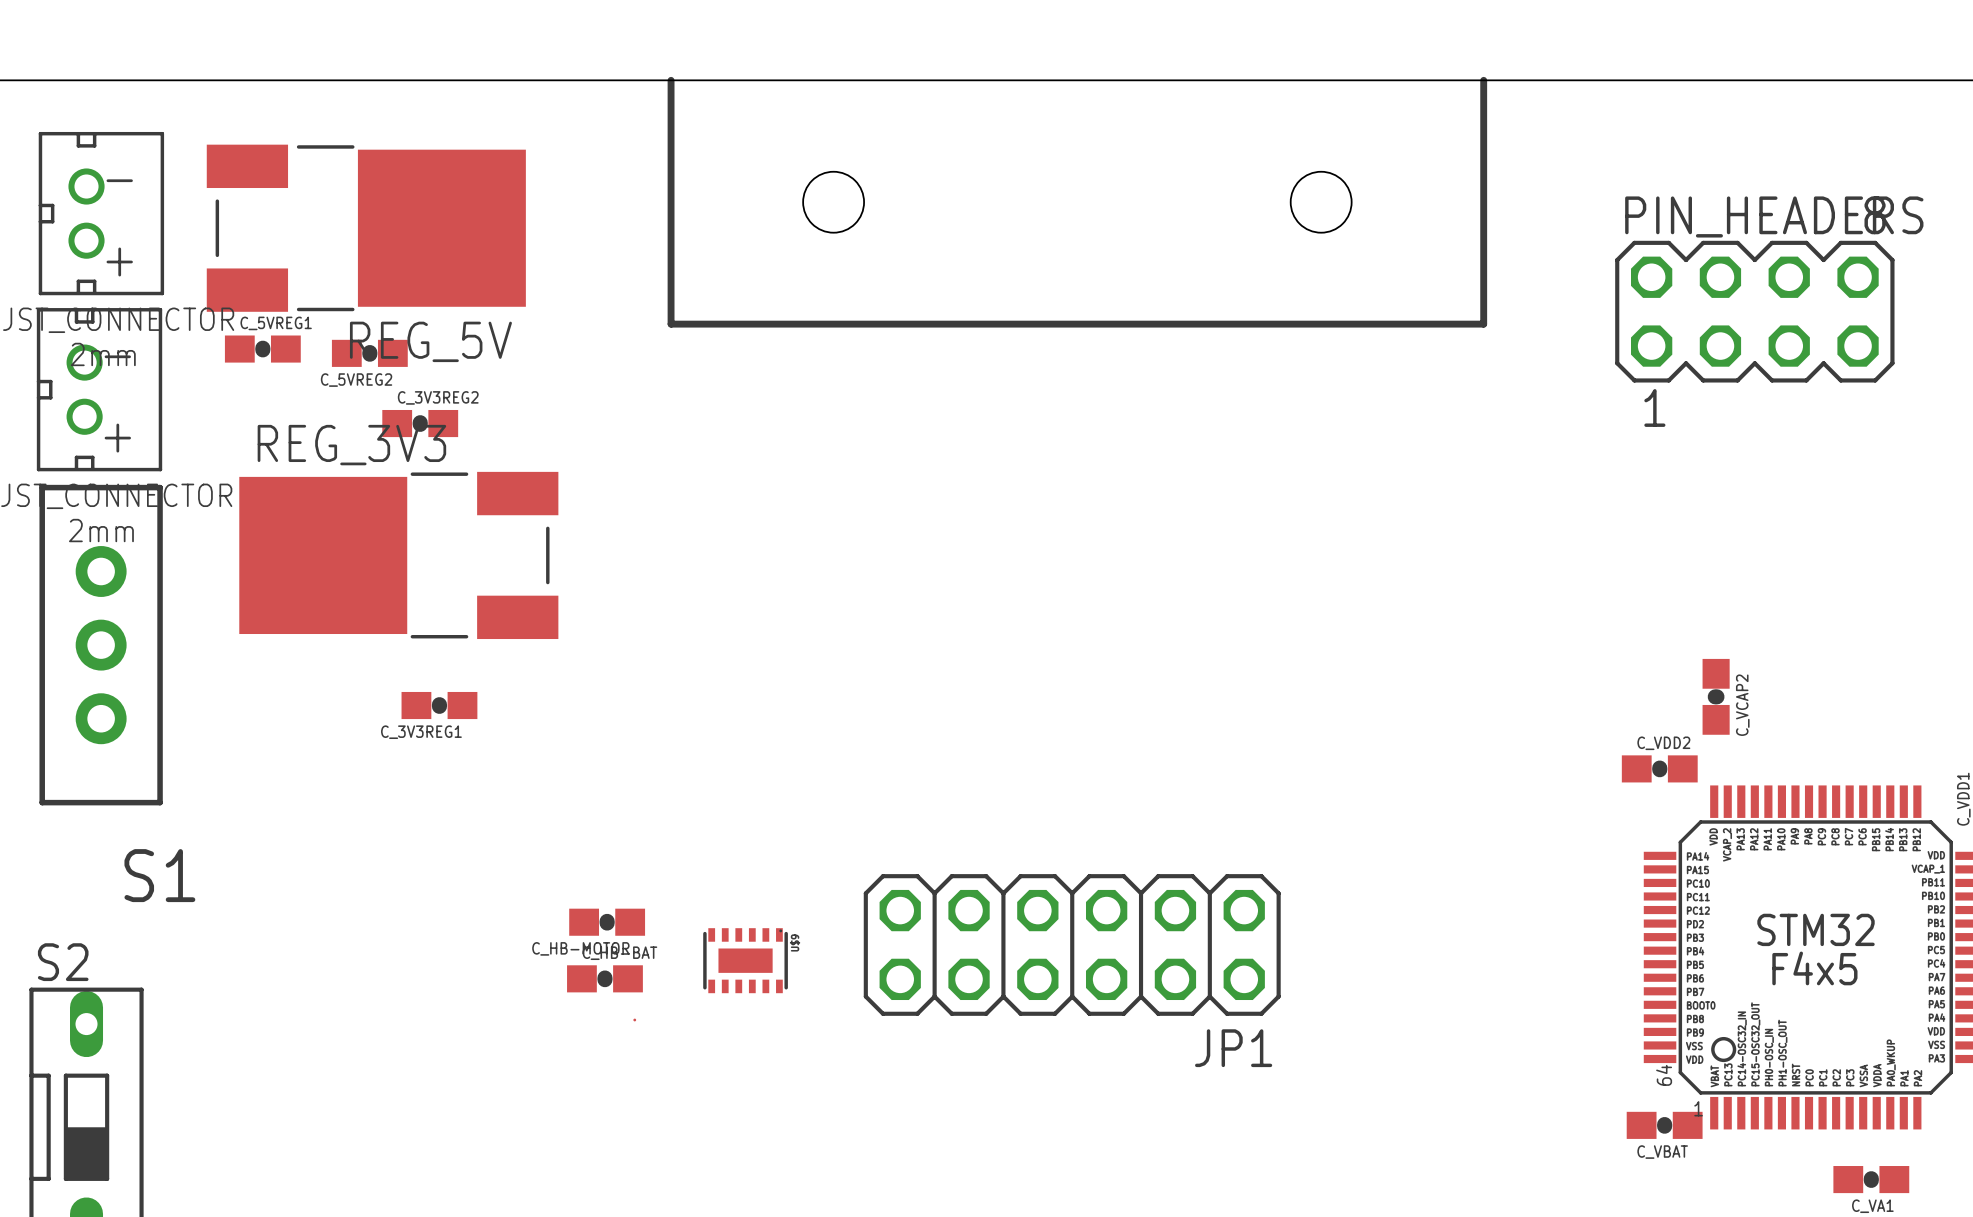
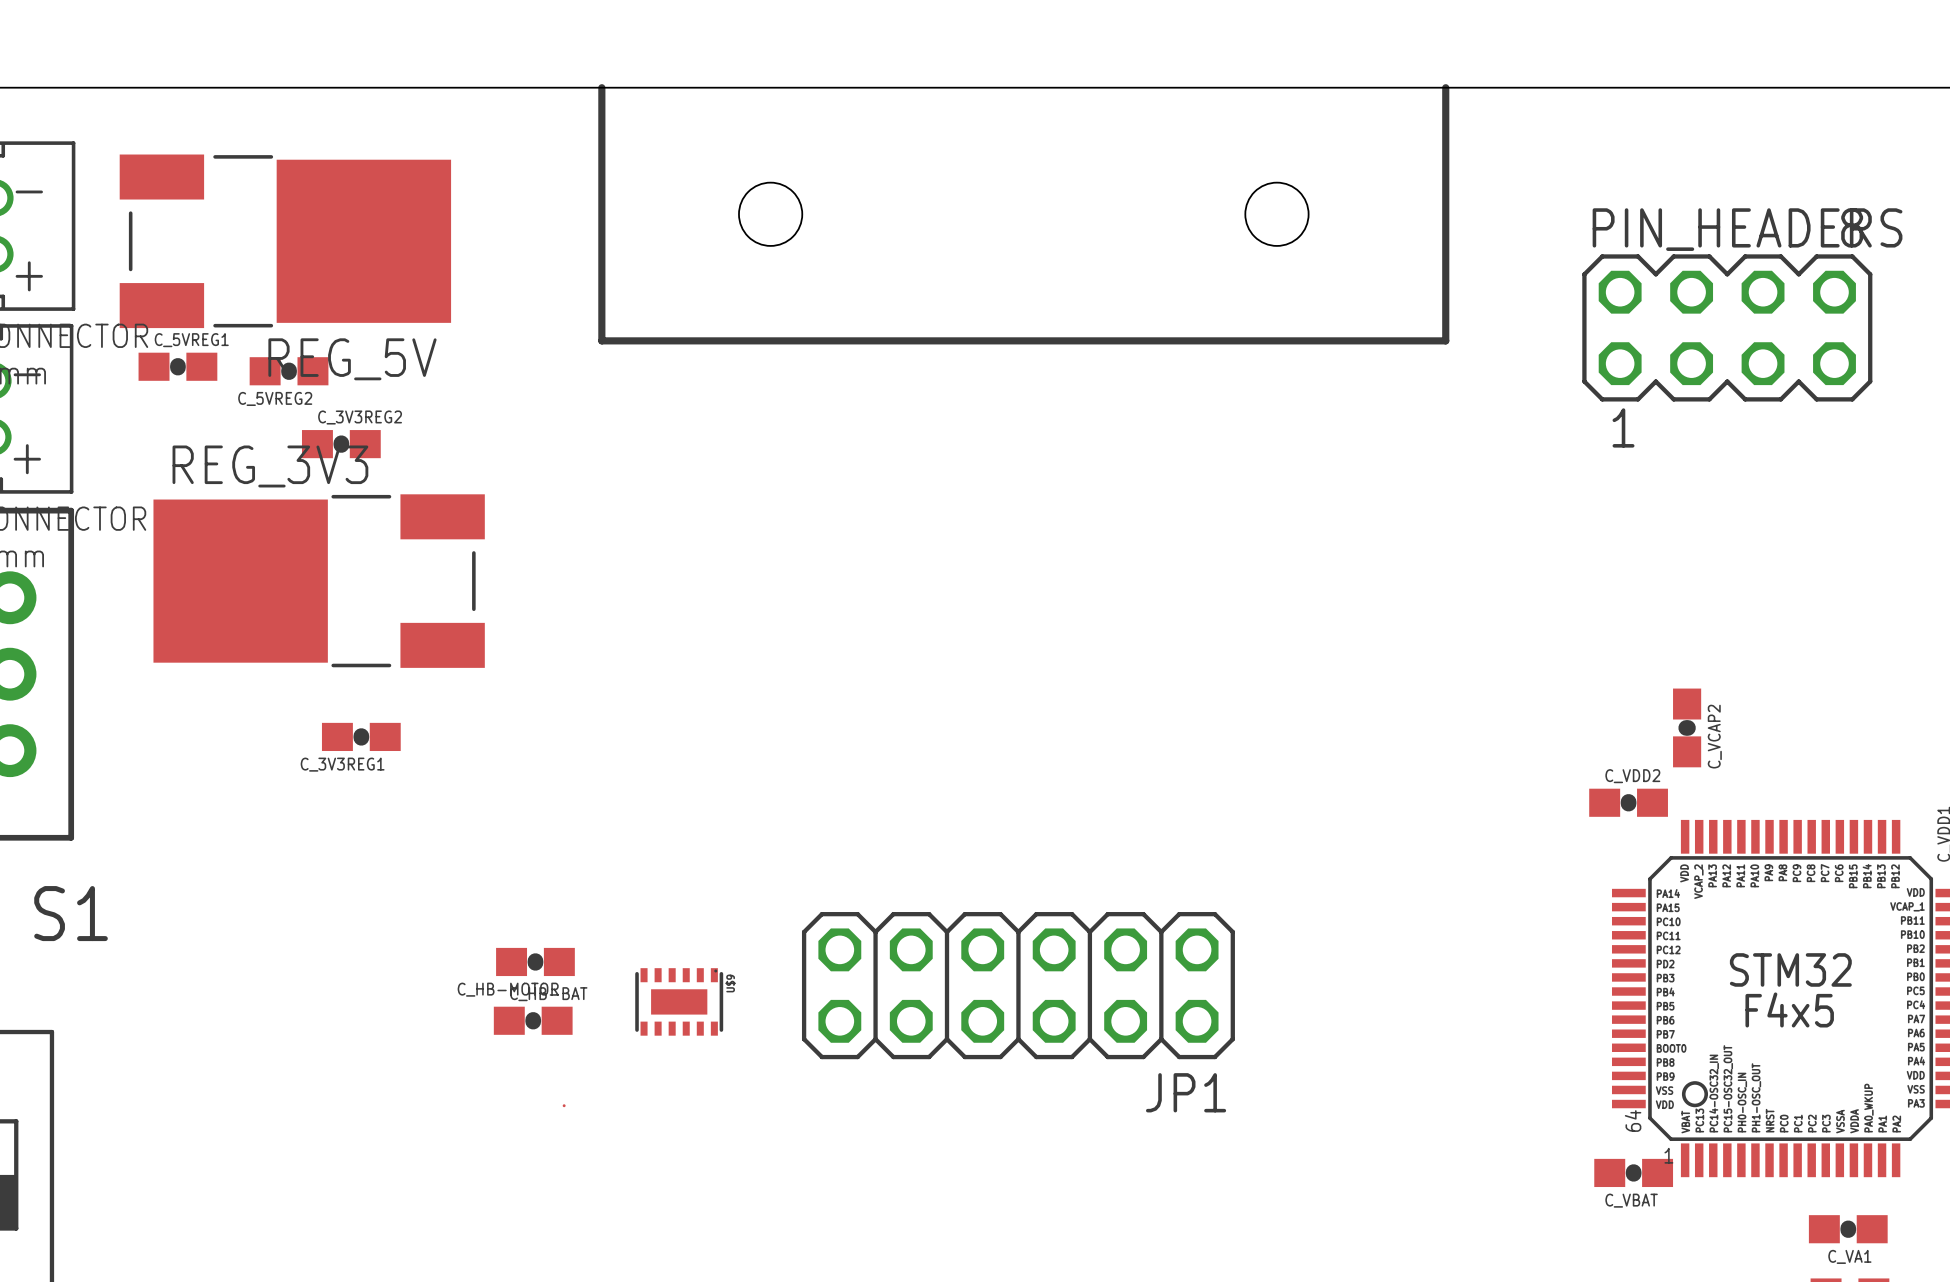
part position: (634, 1020) -> (564, 1105)

